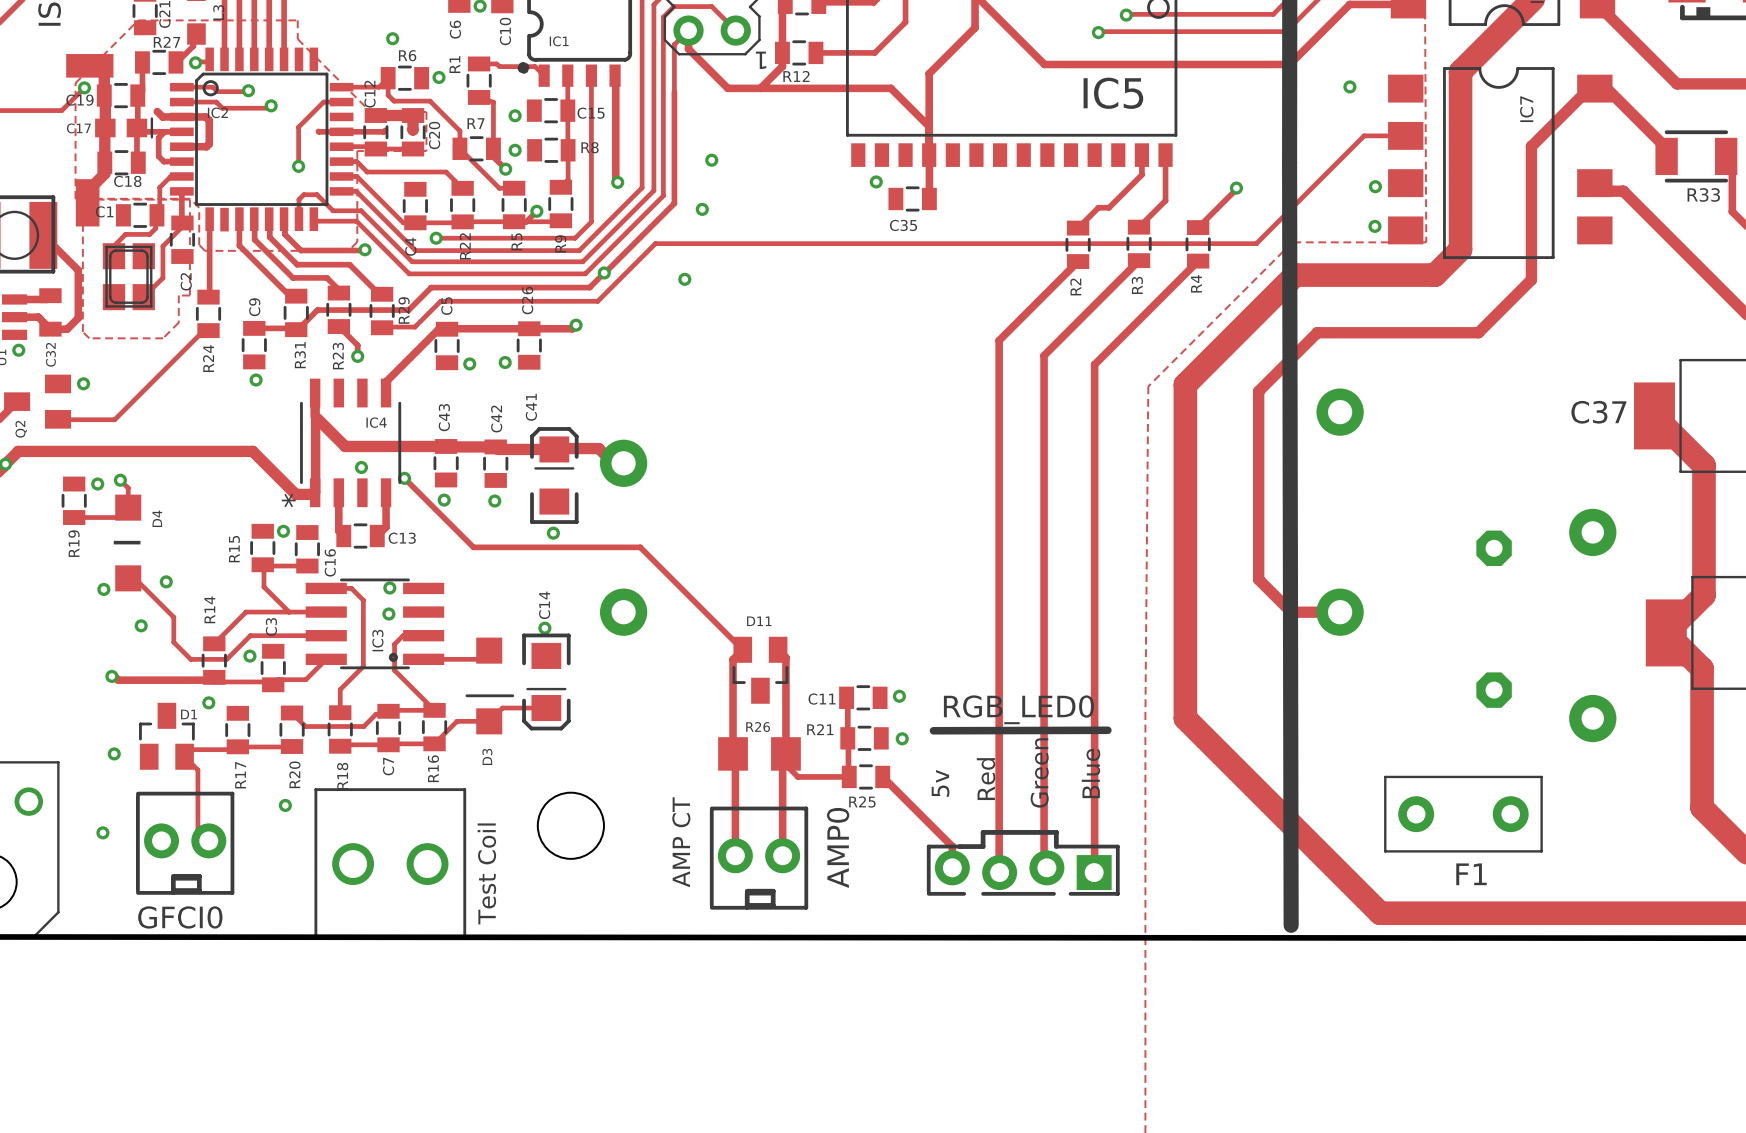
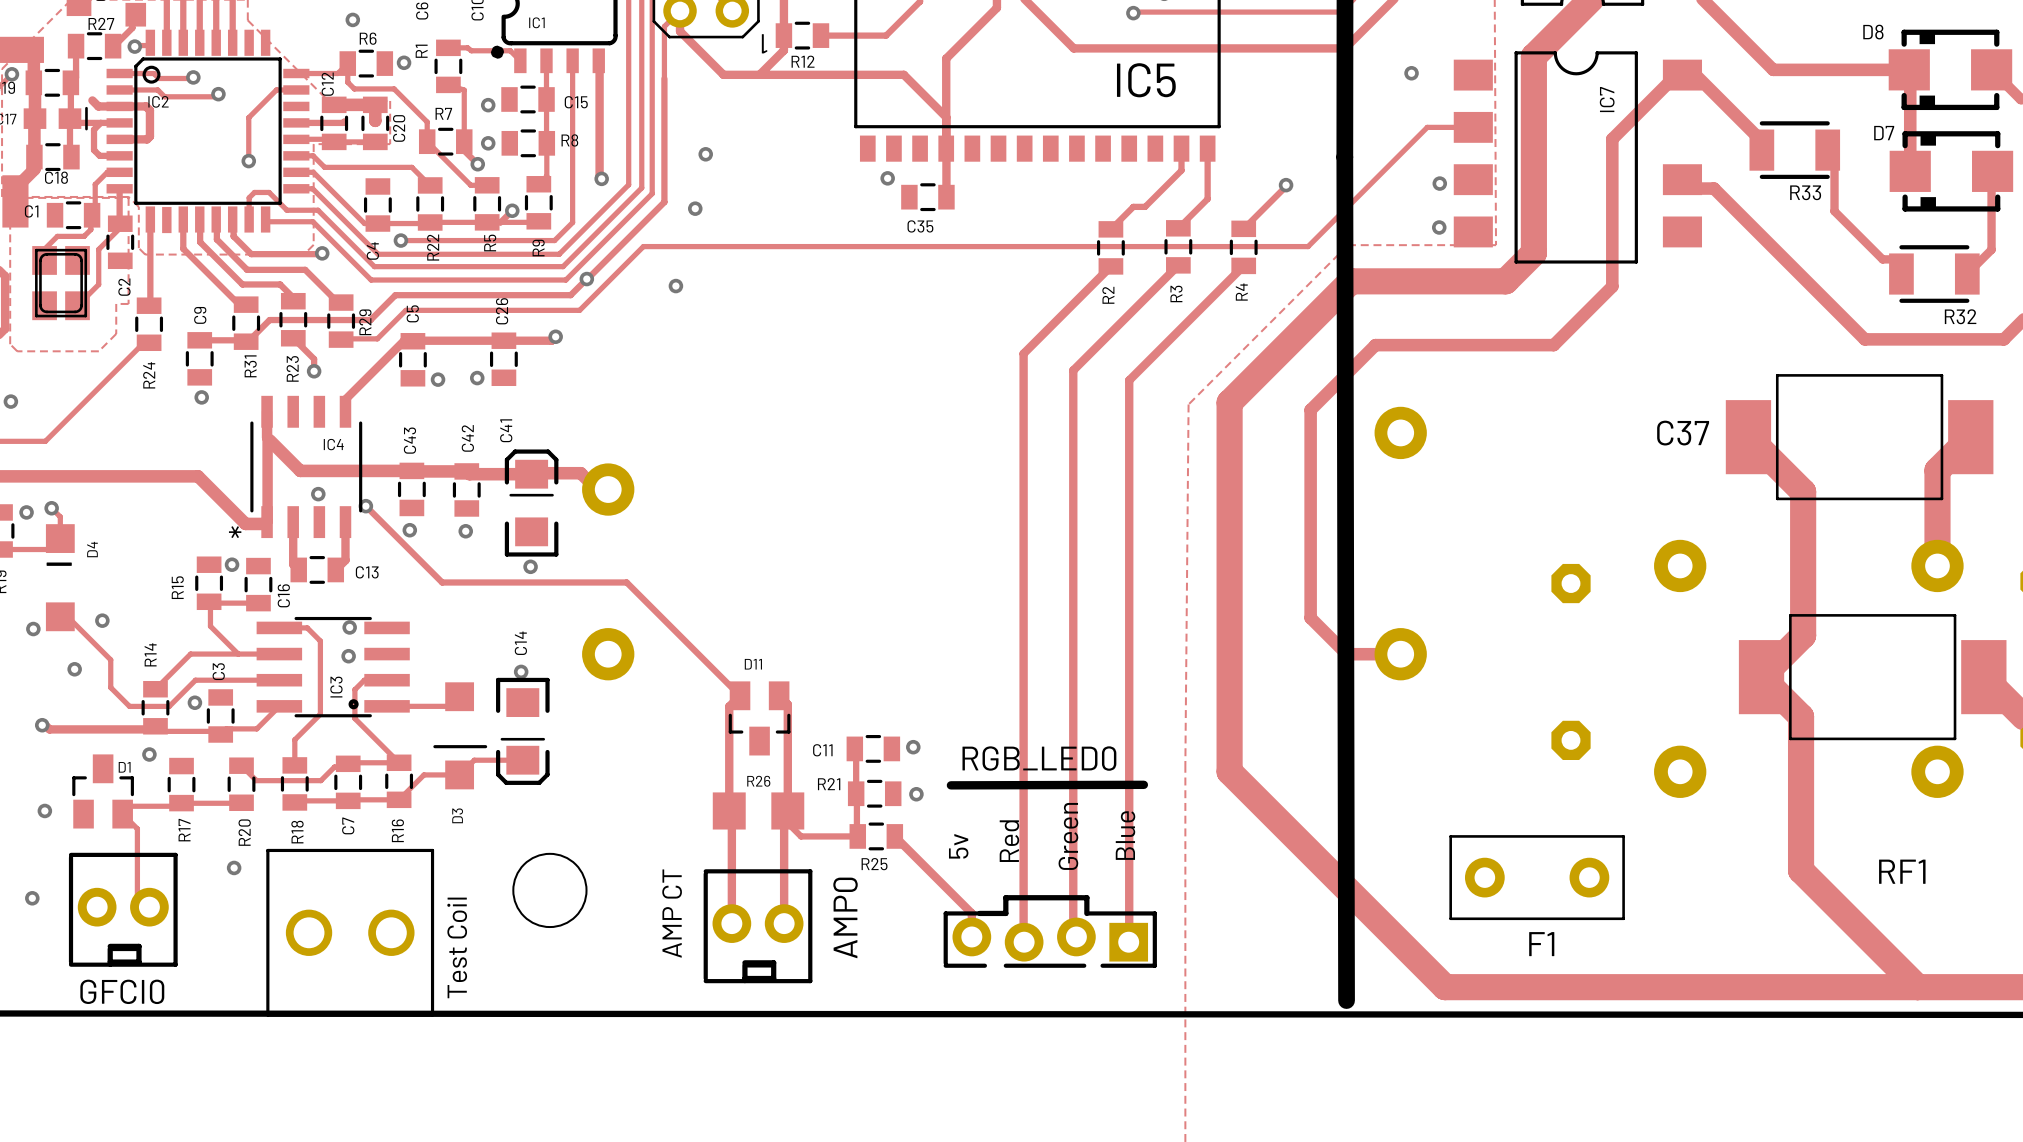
track: (318, 131) (341, 131) -> none

